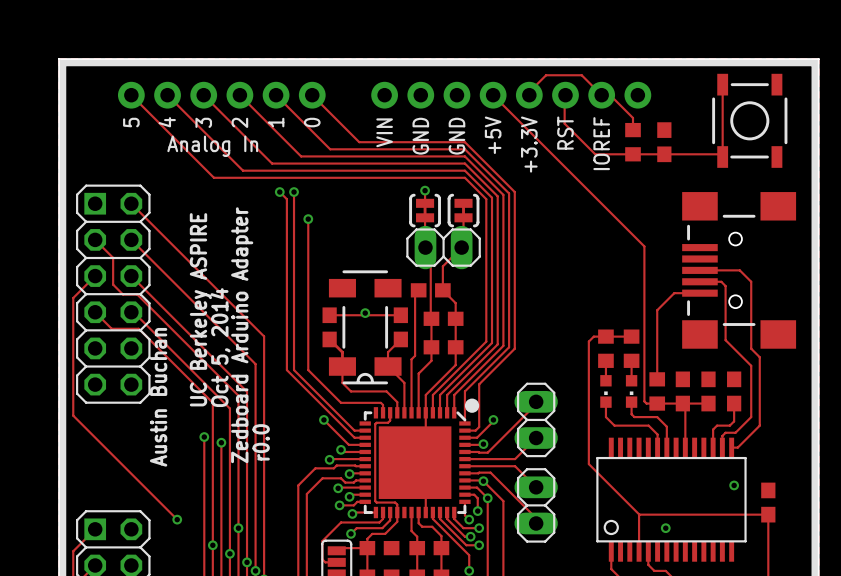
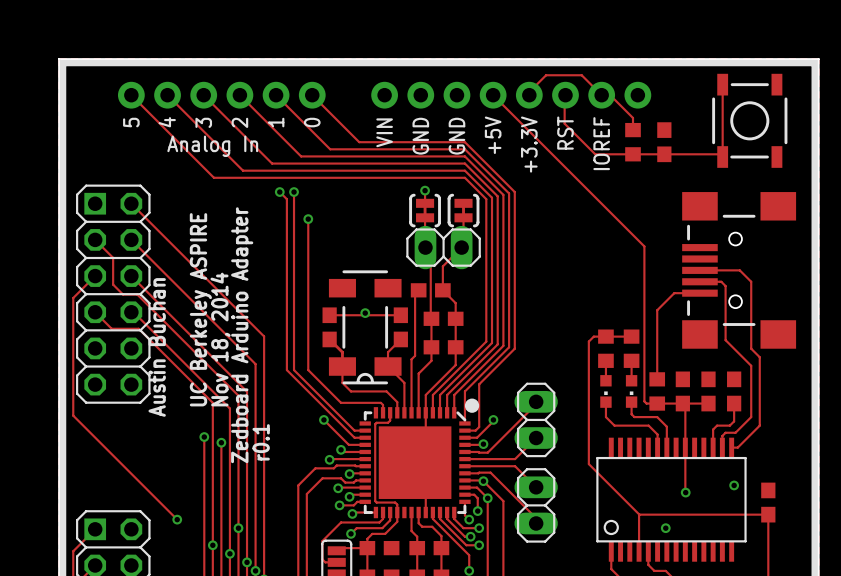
drawing shape: [149, 207, 270, 467] -> [148, 207, 270, 464]
track: none -> (685, 447) (685, 492)
via: none -> (685, 492)

